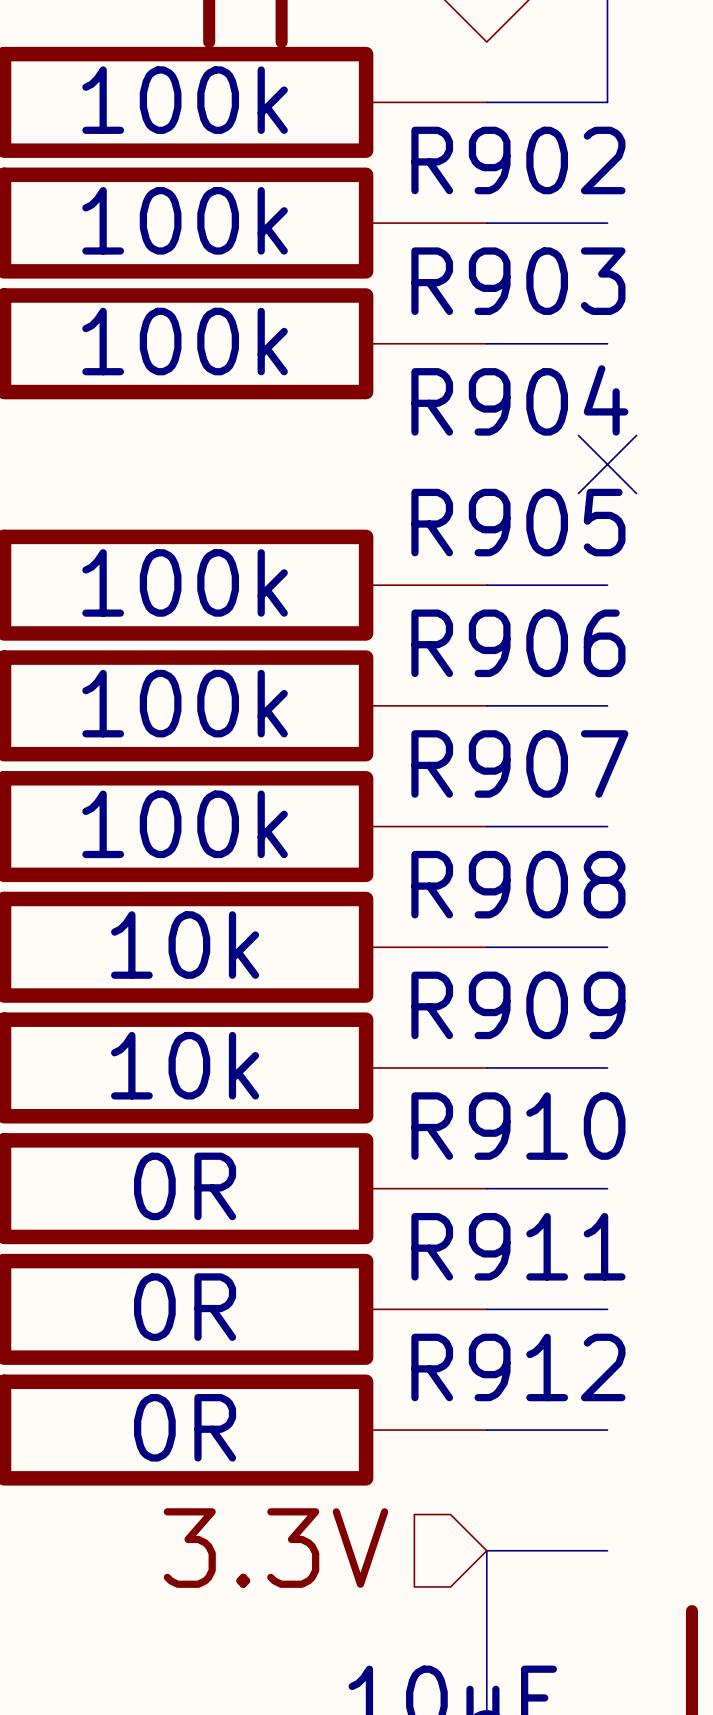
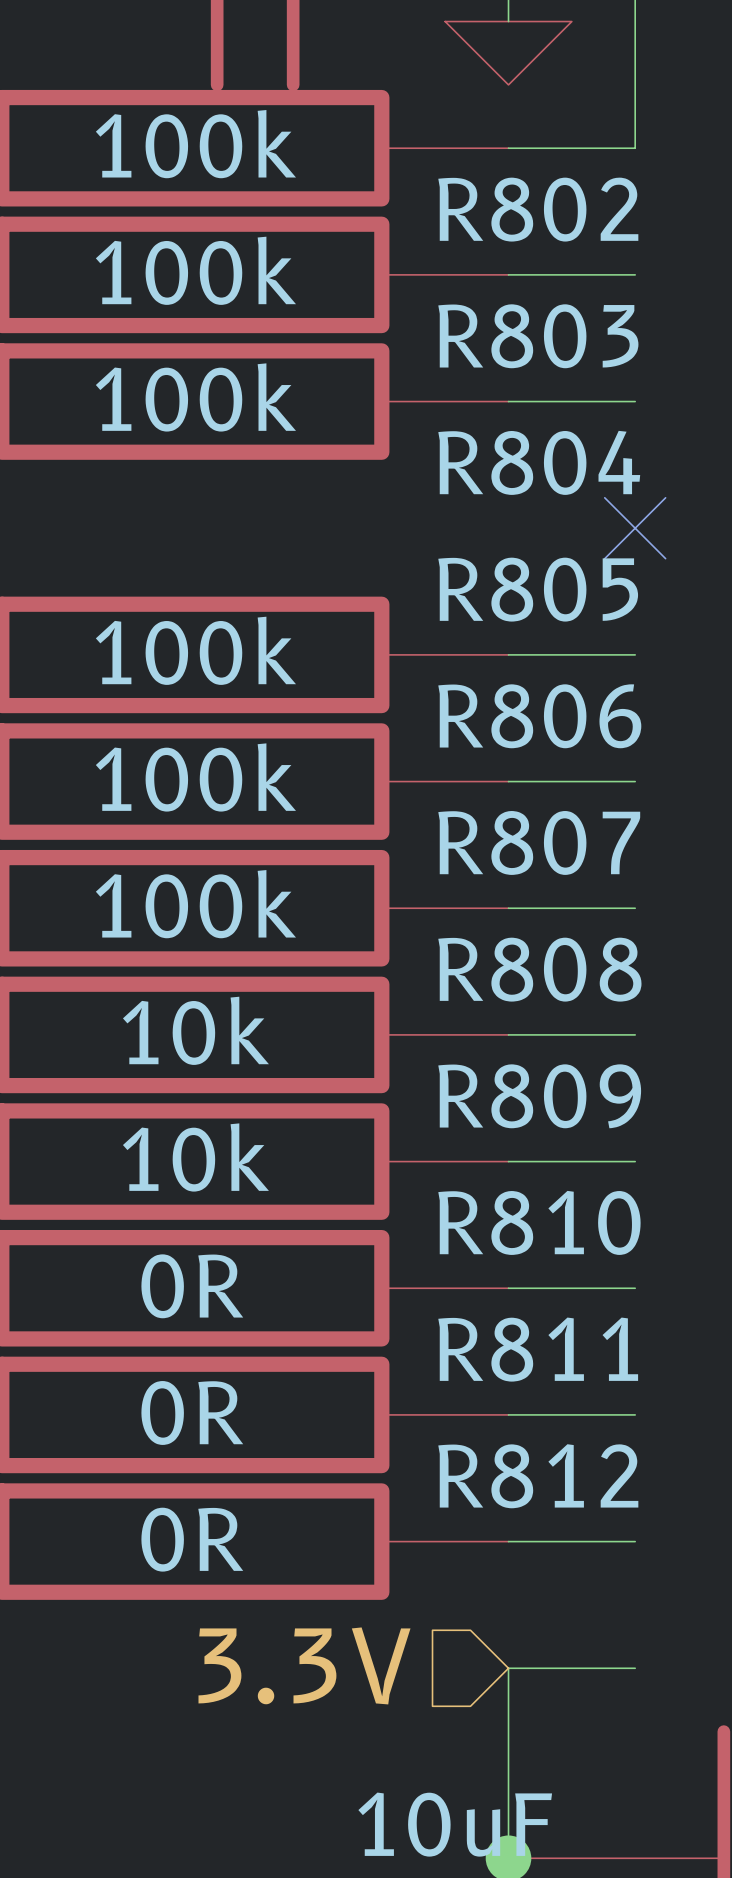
R902 name: R902 (518, 160) -> R802 (538, 209)
R903 name: R903 (518, 281) -> R803 (538, 336)
R904 name: R904 (519, 400) -> R804 (539, 462)
R905 name: R905 (518, 522) -> R805 (538, 589)
R906 name: R906 (518, 643) -> R806 (539, 716)
R907 name: R907 (519, 763) -> R807 (539, 842)
R908 name: R908 (518, 884) -> R808 (539, 969)
R909 name: R909 (518, 1005) -> R809 (539, 1096)
R910 name: R910 (518, 1126) -> R810 (539, 1222)
R911 name: R911 (518, 1246) -> R811 (538, 1349)
R912 name: R912 (518, 1367) -> R812 (538, 1476)

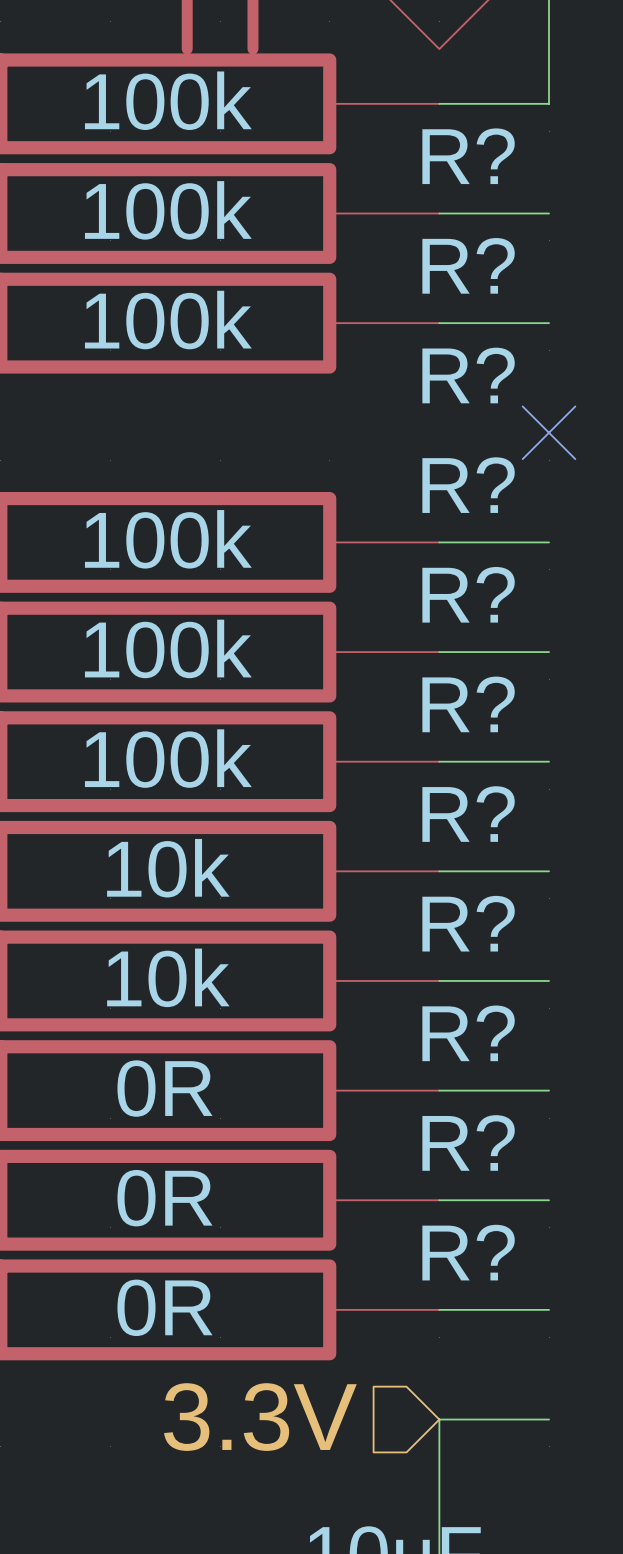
R802 name: R802 (538, 209) -> R? (468, 156)
R803 name: R803 (538, 336) -> R? (468, 265)
R804 name: R804 (539, 462) -> R? (468, 375)
R805 name: R805 (538, 589) -> R? (468, 485)
R806 name: R806 (539, 716) -> R? (468, 594)
R807 name: R807 (539, 842) -> R? (468, 704)
R808 name: R808 (539, 969) -> R? (468, 814)
R809 name: R809 (539, 1096) -> R? (468, 923)
R810 name: R810 (539, 1222) -> R? (468, 1033)
R811 name: R811 (538, 1349) -> R? (468, 1142)
R812 name: R812 (538, 1476) -> R? (468, 1252)

